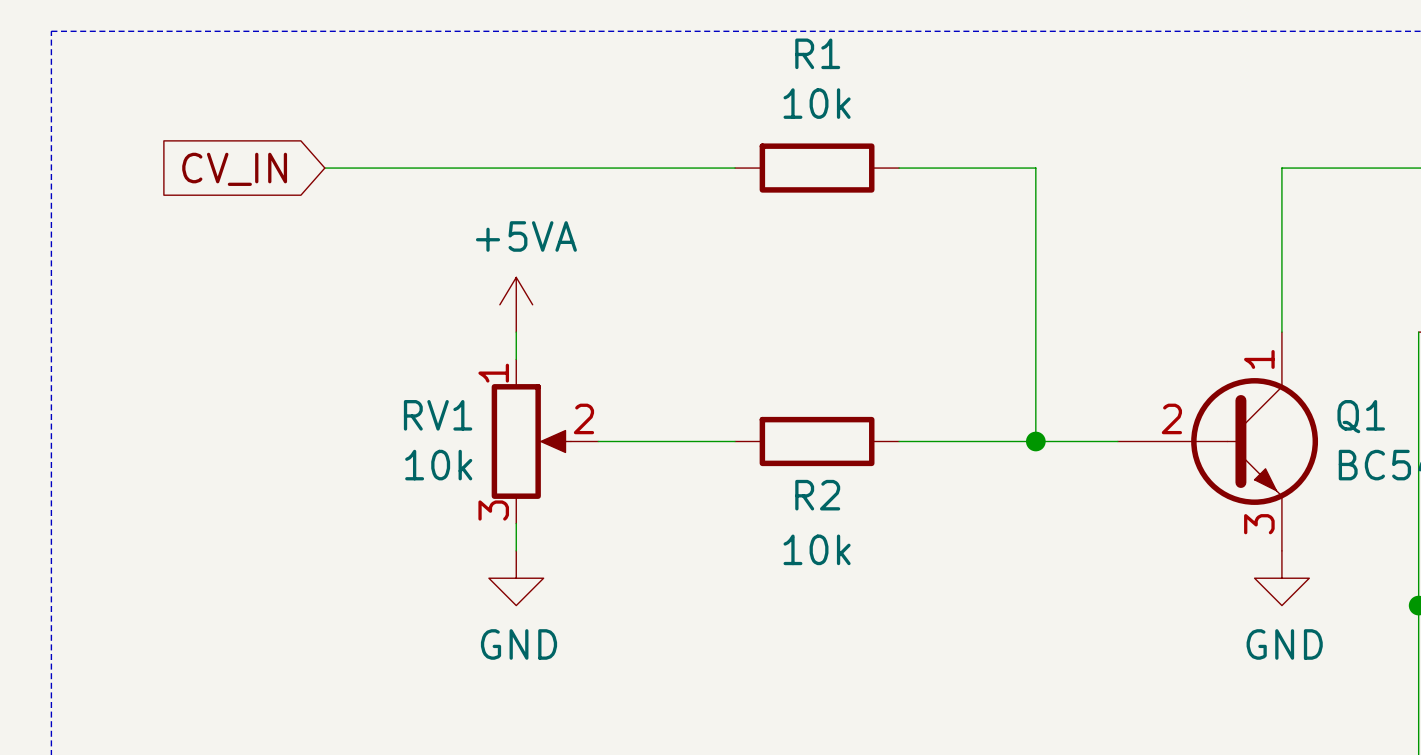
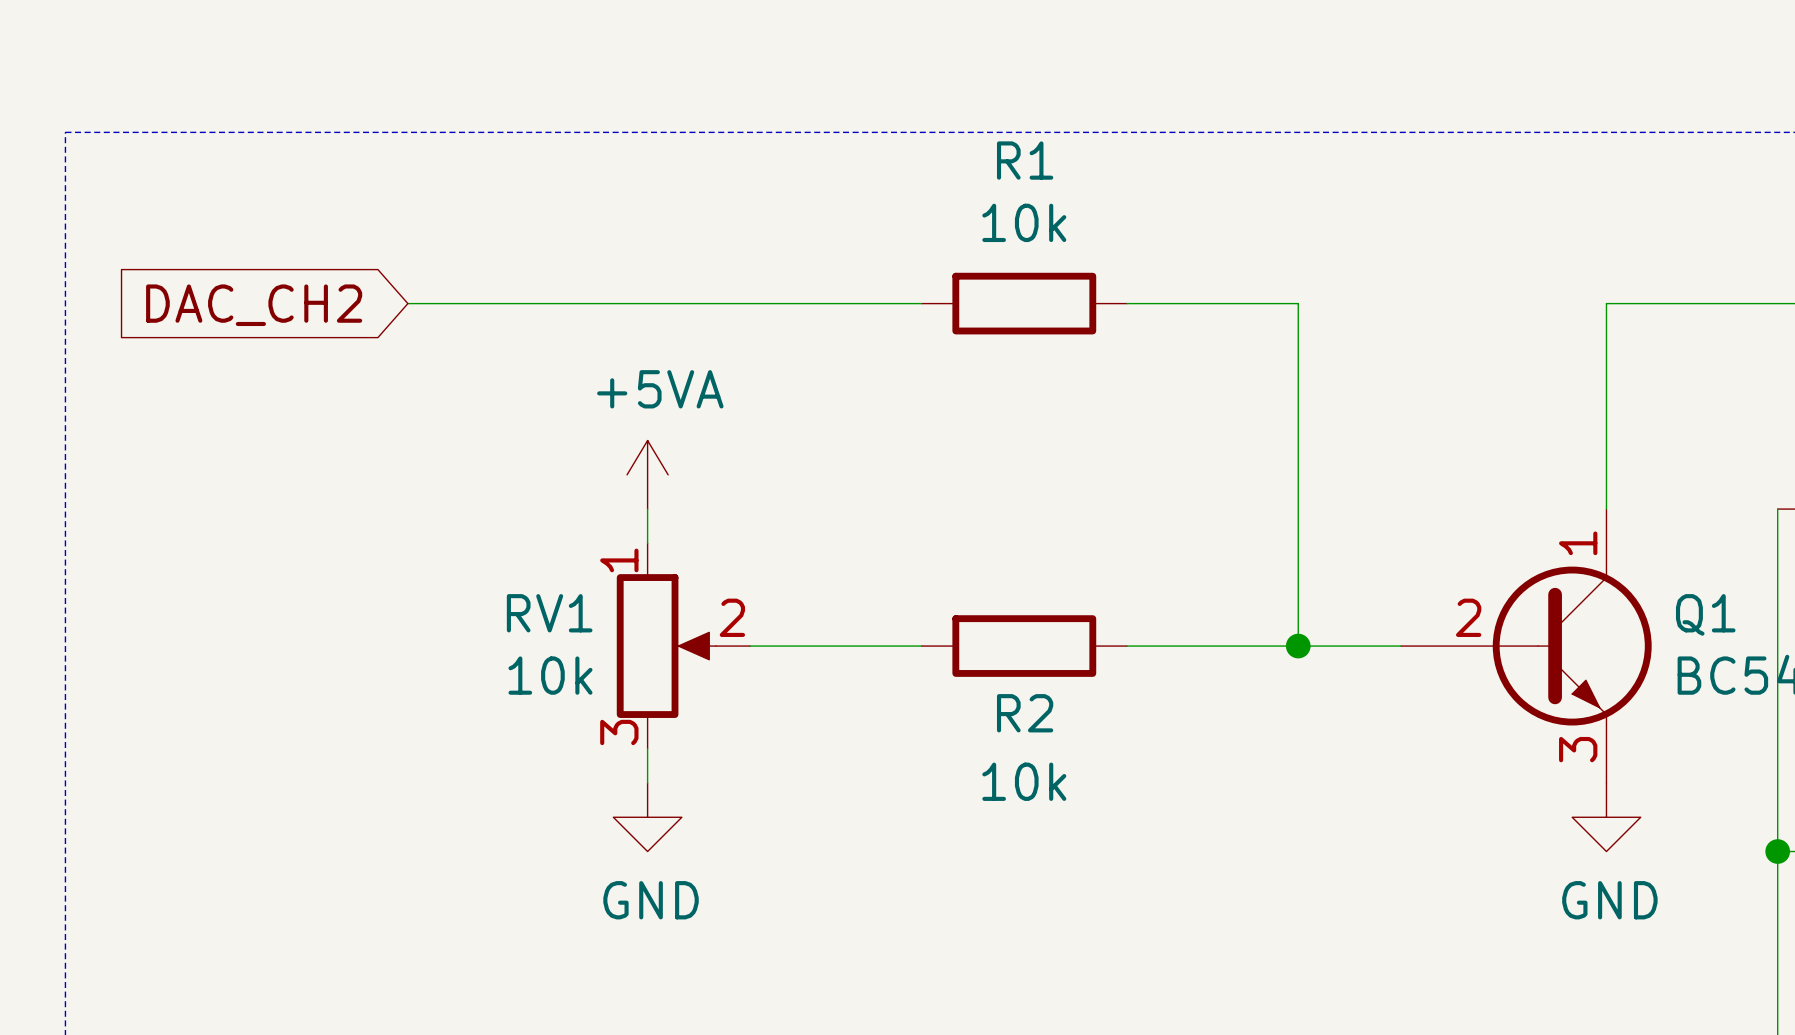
global label: CV_IN (234, 169) -> DAC_CH2 (254, 305)

